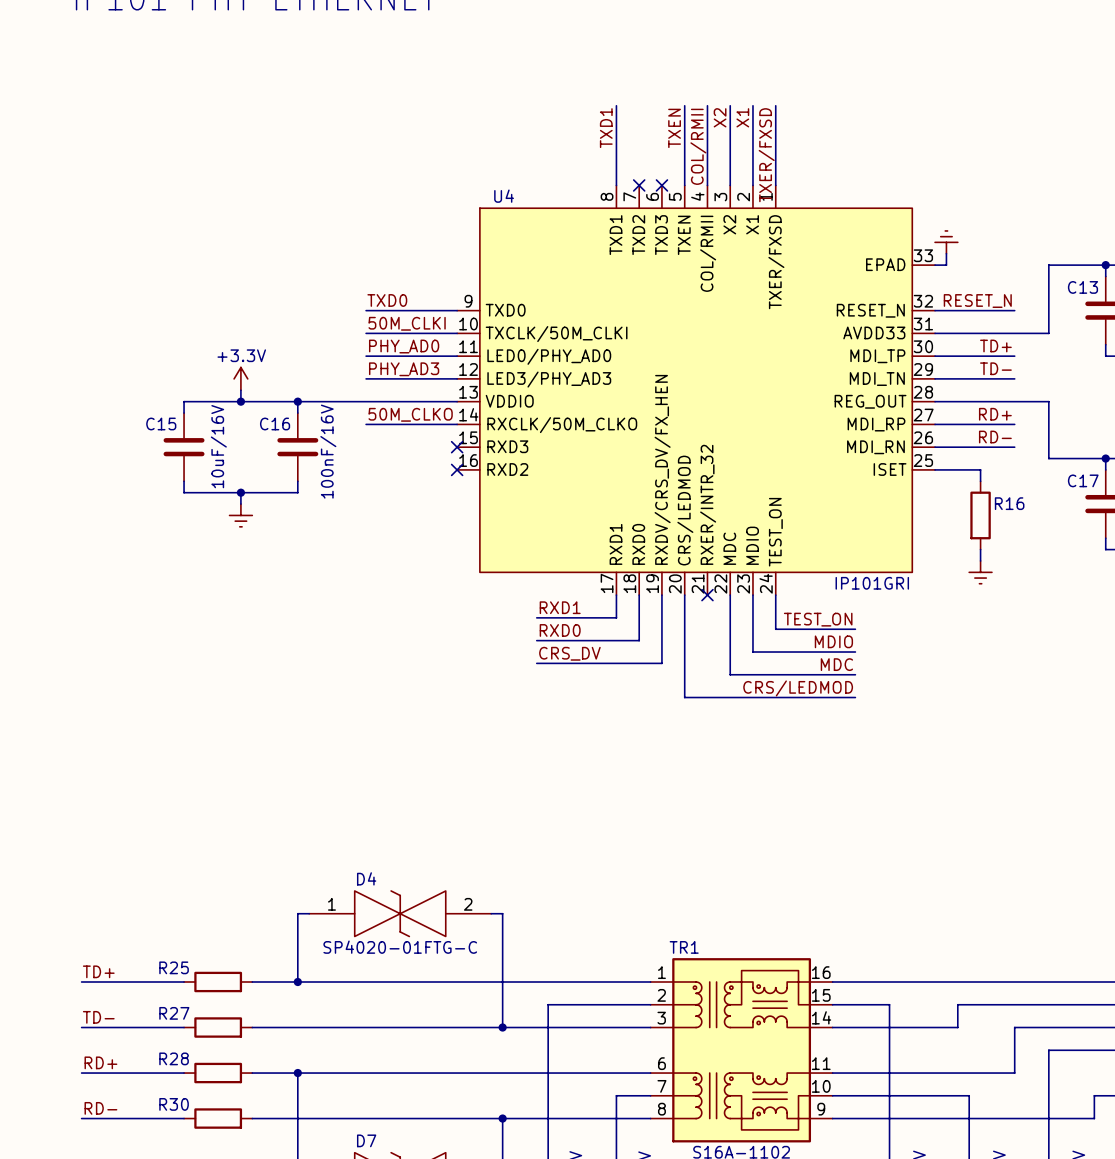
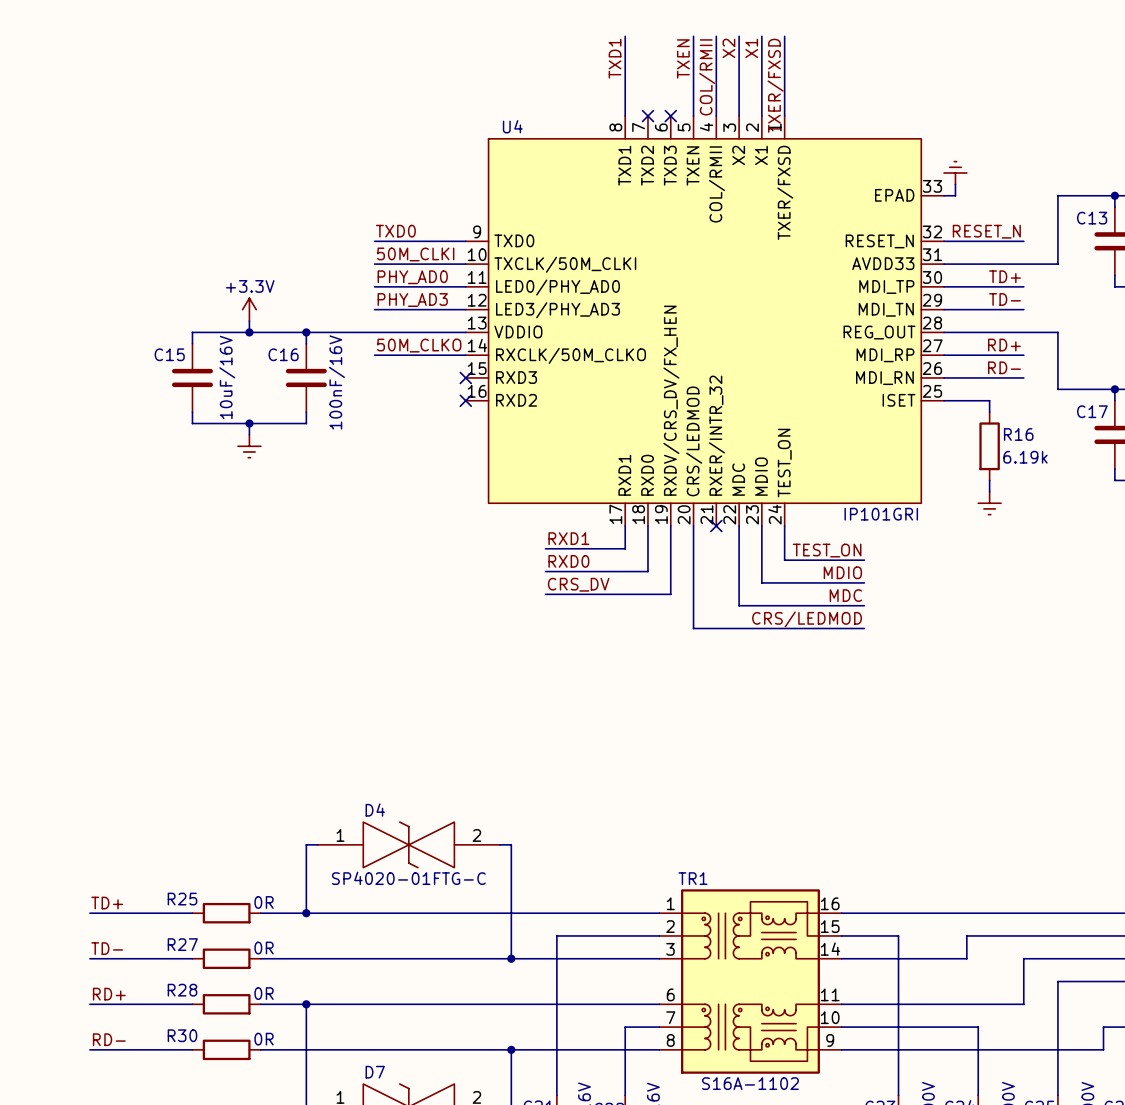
R16 value: none -> 6.19k (1025, 457)
R25 value: none -> 0R (264, 902)
R27 value: none -> 0R (264, 948)
R28 value: none -> 0R (264, 993)
R30 value: none -> 0R (264, 1039)

